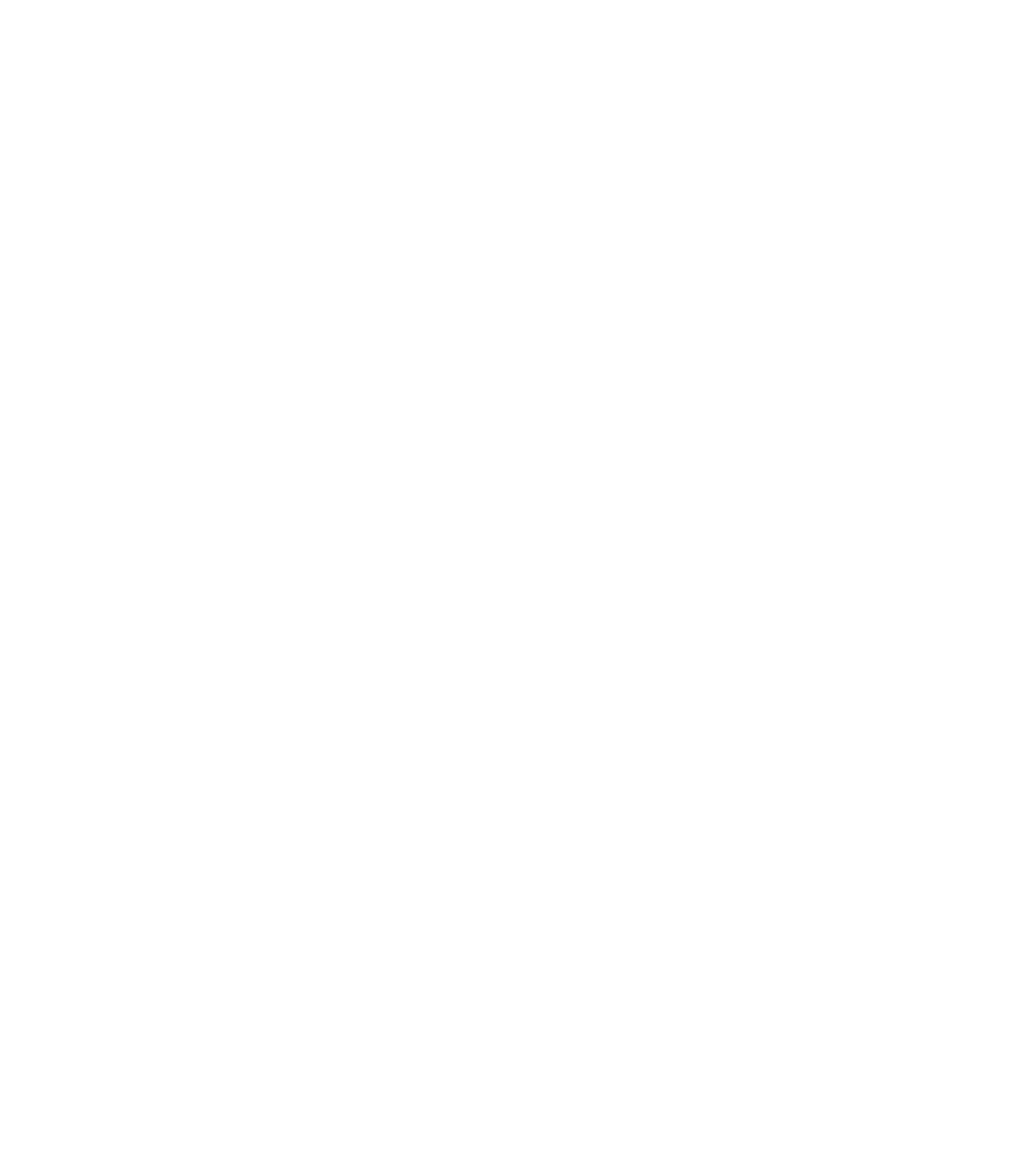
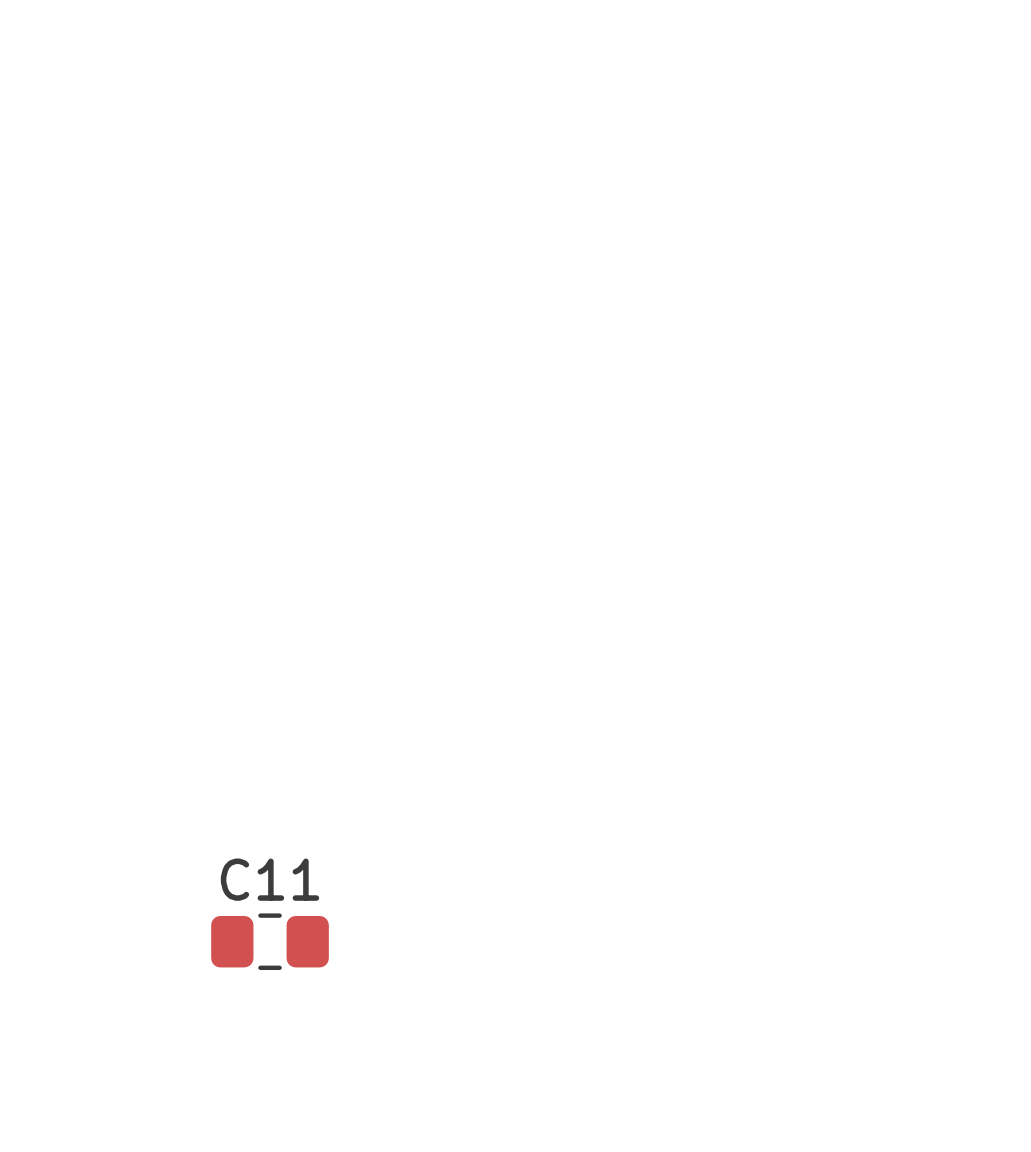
C11: none -> (270, 941)

